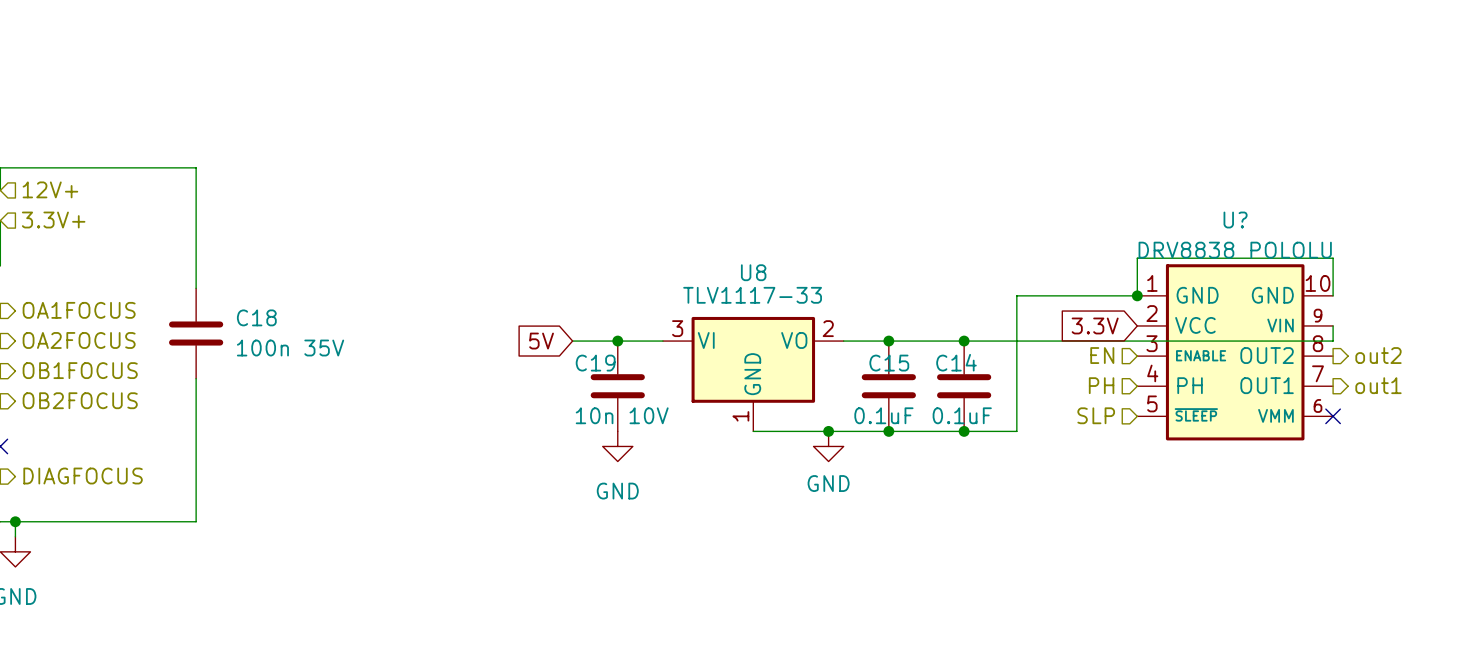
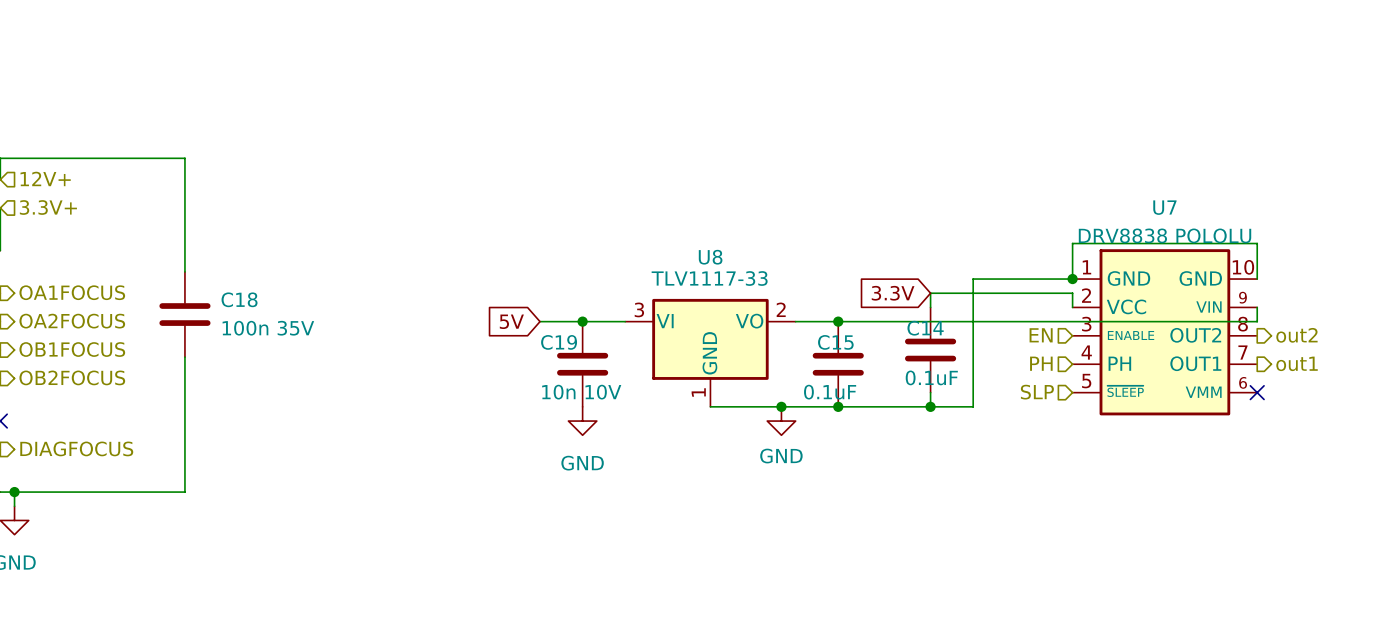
U? name: U? (1235, 220) -> U7 (1164, 207)
wire: (1031, 295) (1016, 295) (1016, 431) -> (973, 279) (973, 406) (958, 406)
wire: none -> (930, 307) (930, 293) (1072, 293) (1072, 307)
global label position: 3.3V (1095, 325) -> 3.3V (893, 293)
junction: (964, 341) -> none
C14 position: (964, 386) -> (930, 350)
wire: none -> (930, 392) (930, 406)
junction position: (964, 431) -> (930, 406)

